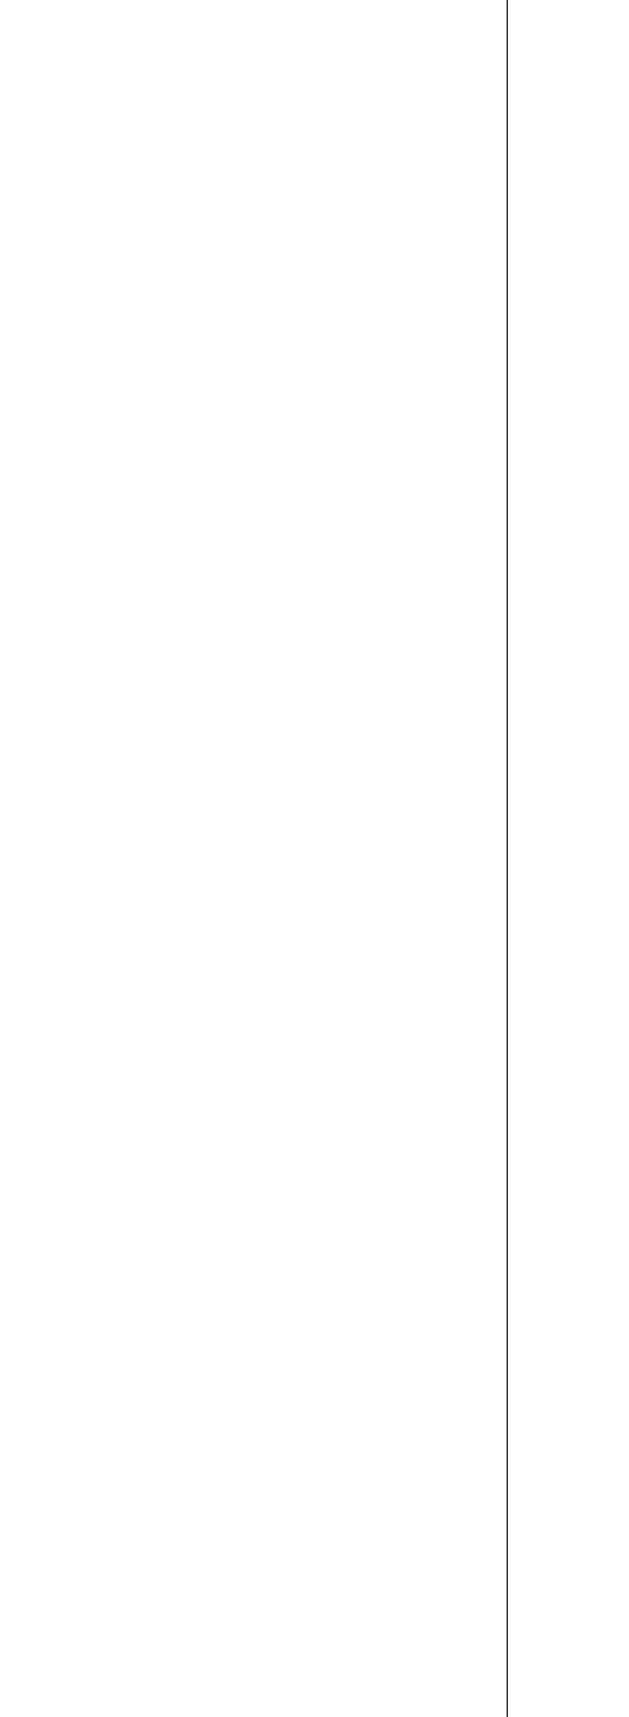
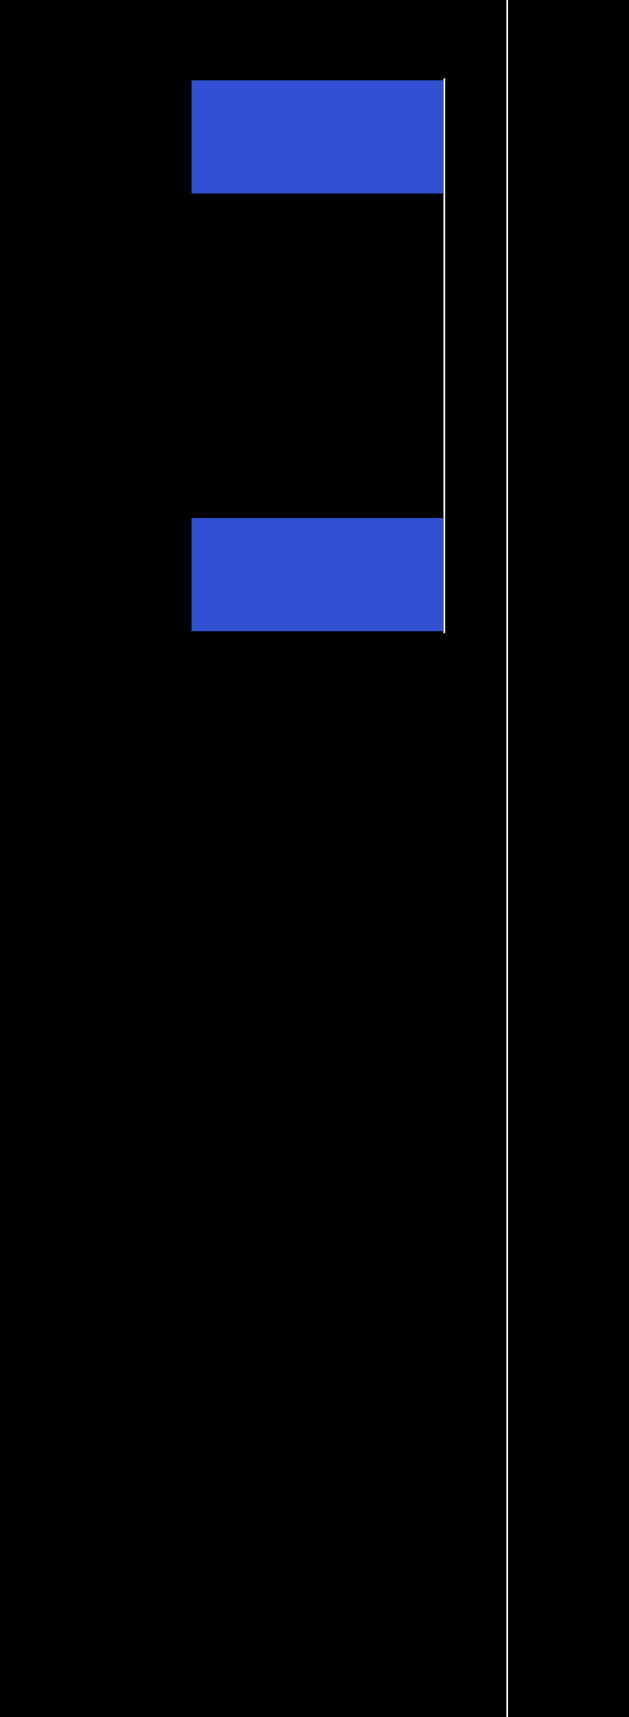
part: none -> (317, 355)

